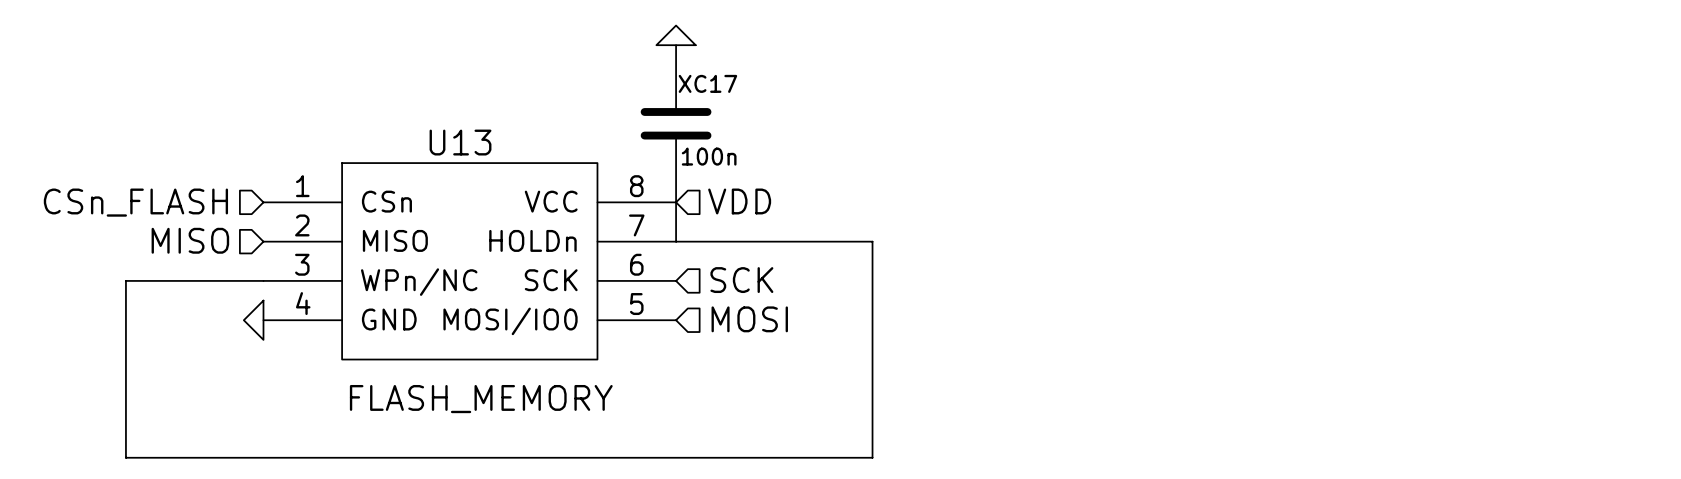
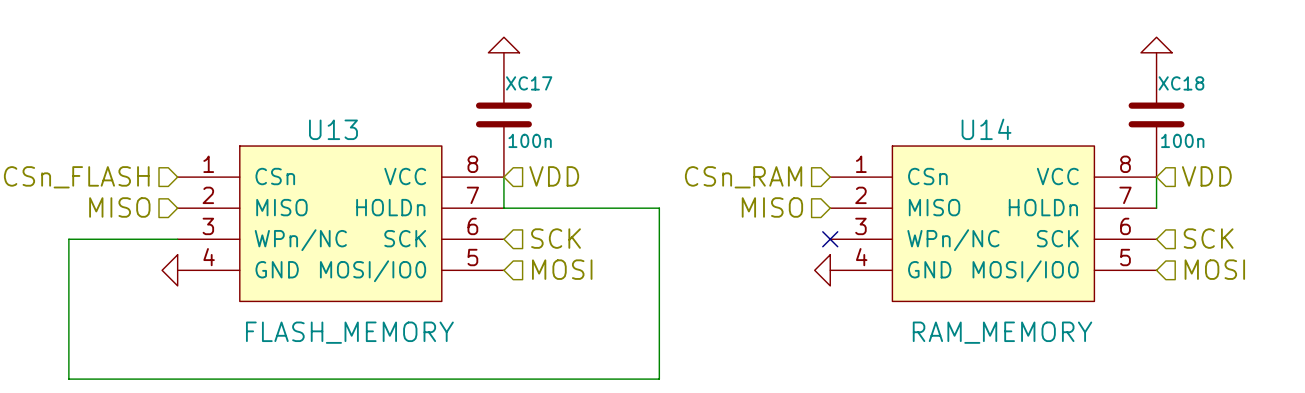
power symbol: none -> (1156, 45)
XC18: none -> 100n (1156, 114)
hierarchical label: none -> VDD (1206, 176)
hierarchical label: none -> CSn_RAM (743, 177)
wire: none -> (1156, 177) (1156, 208)
hierarchical label: none -> MISO (772, 207)
U14: none -> RAM_MEMORY (993, 223)
no-connect mark: none -> (830, 239)
hierarchical label: none -> SCK (1208, 238)
hierarchical label: none -> MOSI (1214, 269)
power symbol: none -> (822, 270)

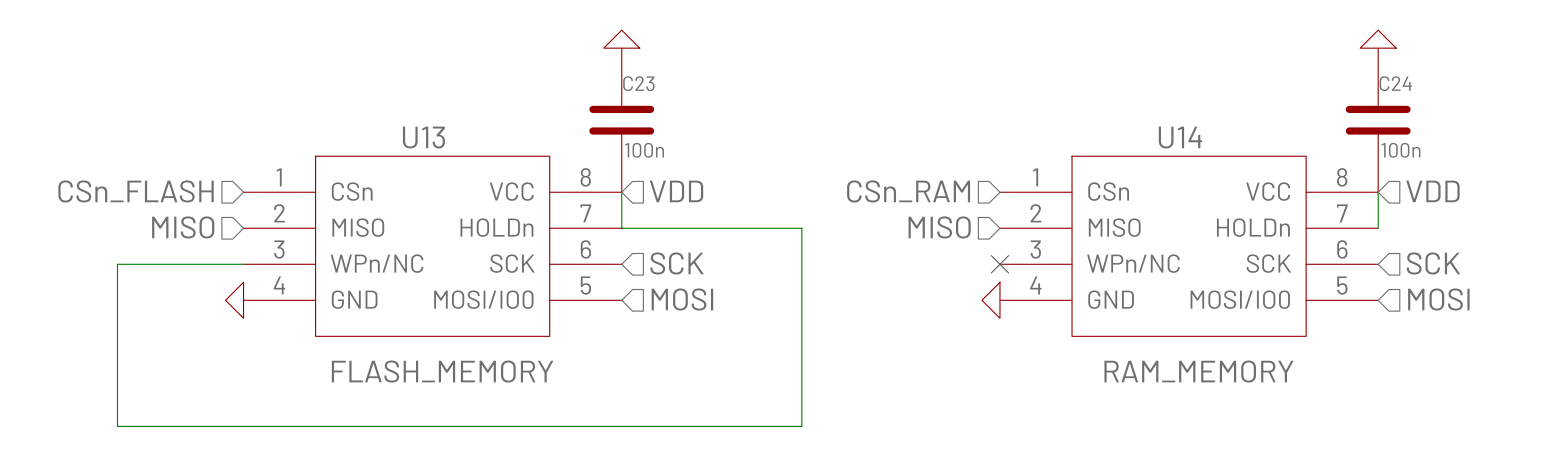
XC17 name: XC17 (529, 83) -> C23 (638, 83)
XC18 name: XC18 (1181, 83) -> C24 (1395, 83)

